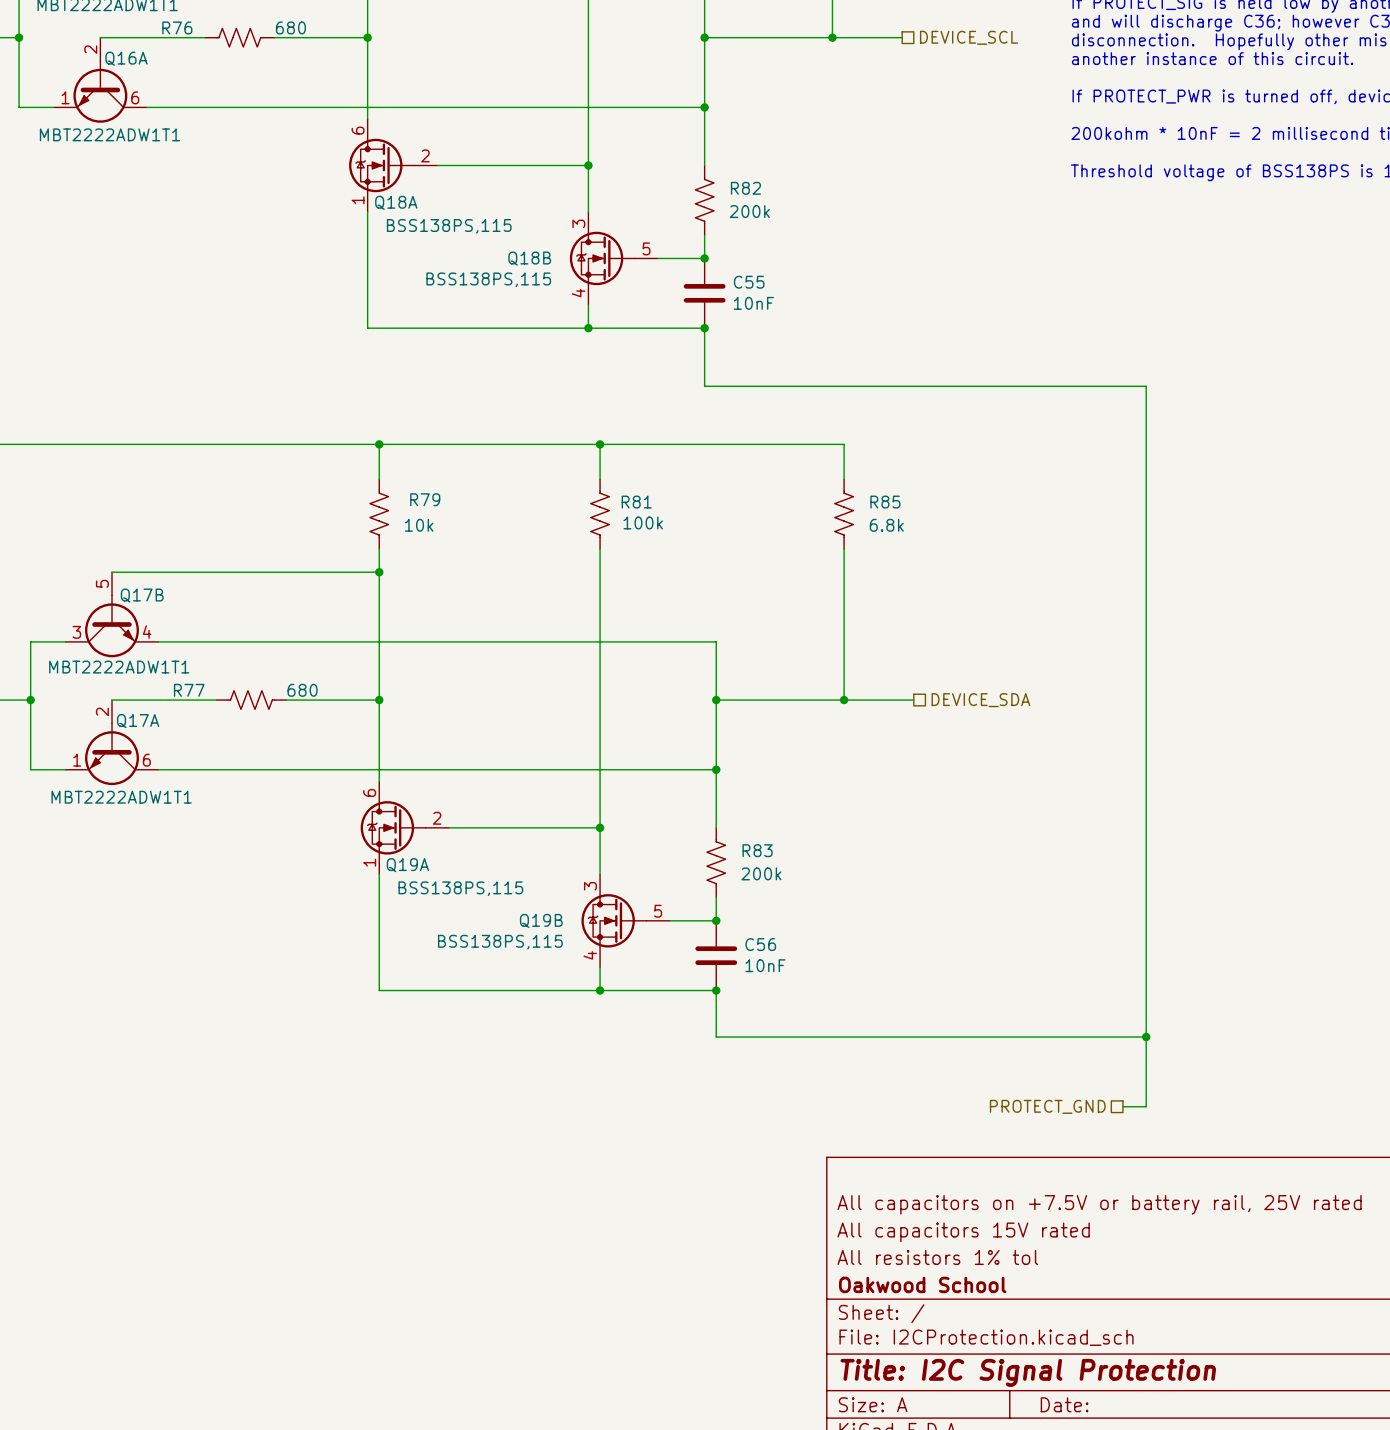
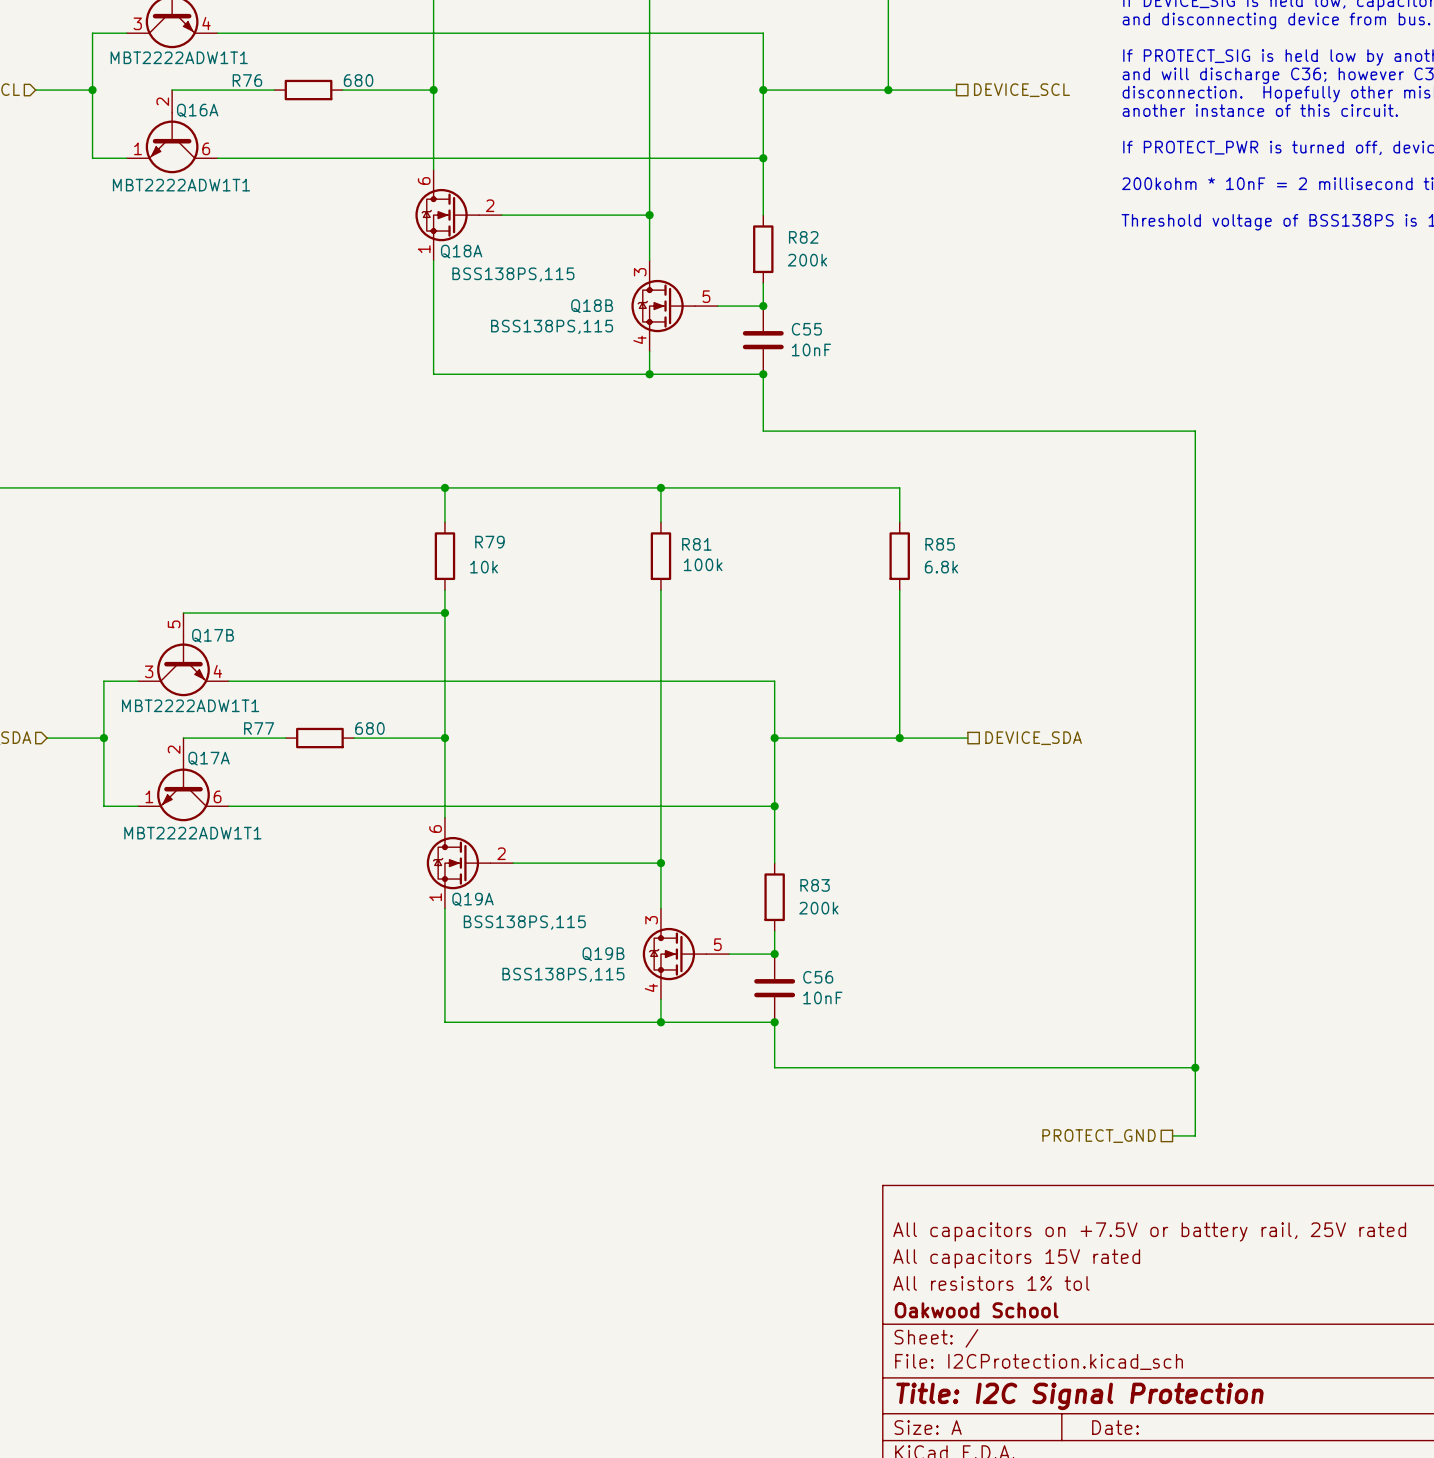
R76 symbol: [204, 28, 275, 47] -> [274, 79, 343, 101]
R82 symbol: [695, 165, 714, 236] -> [753, 215, 774, 284]
R79 symbol: [369, 479, 389, 549] -> [434, 522, 456, 591]
R81 symbol: [590, 479, 610, 549] -> [650, 522, 672, 591]
R85 symbol: [834, 479, 854, 549] -> [889, 522, 910, 591]
R77 symbol: [216, 690, 287, 710] -> [285, 727, 355, 749]
R83 symbol: [706, 827, 726, 898] -> [764, 863, 785, 932]

